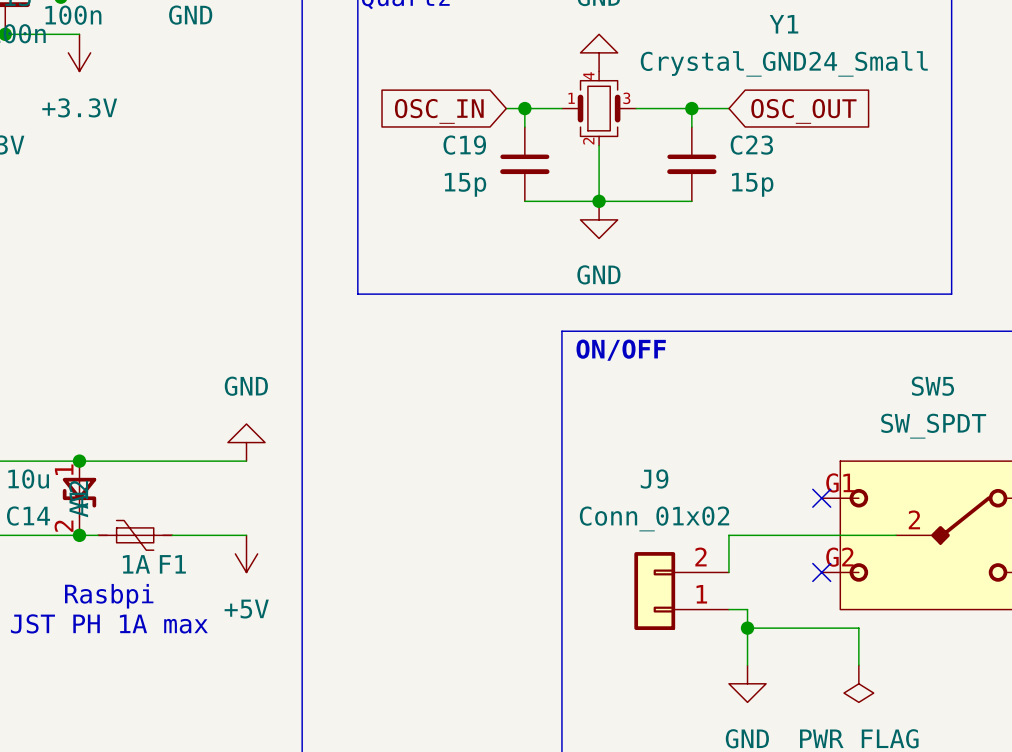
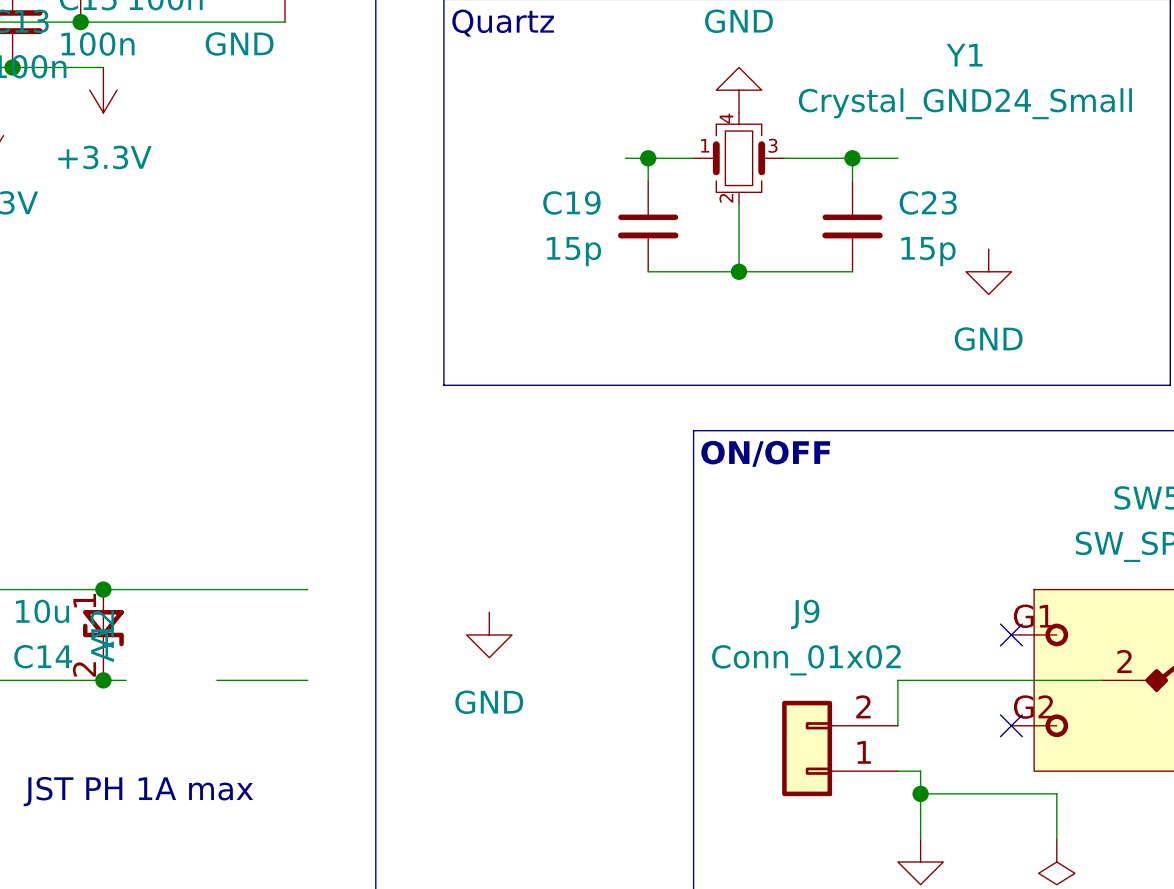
global label: OSC_IN (439, 111) -> none
global label: OSC_OUT (803, 111) -> none
power symbol: none -> GND (988, 271)
power symbol: GND (599, 219) -> none
power symbol rotation: 0° (246, 442) -> 180° (489, 634)
power symbol position: GND (246, 442) -> GND (489, 634)
F1: 1A (135, 535) -> none
power symbol: +5V (246, 553) -> none
text: Rasbpi (109, 596) -> none

